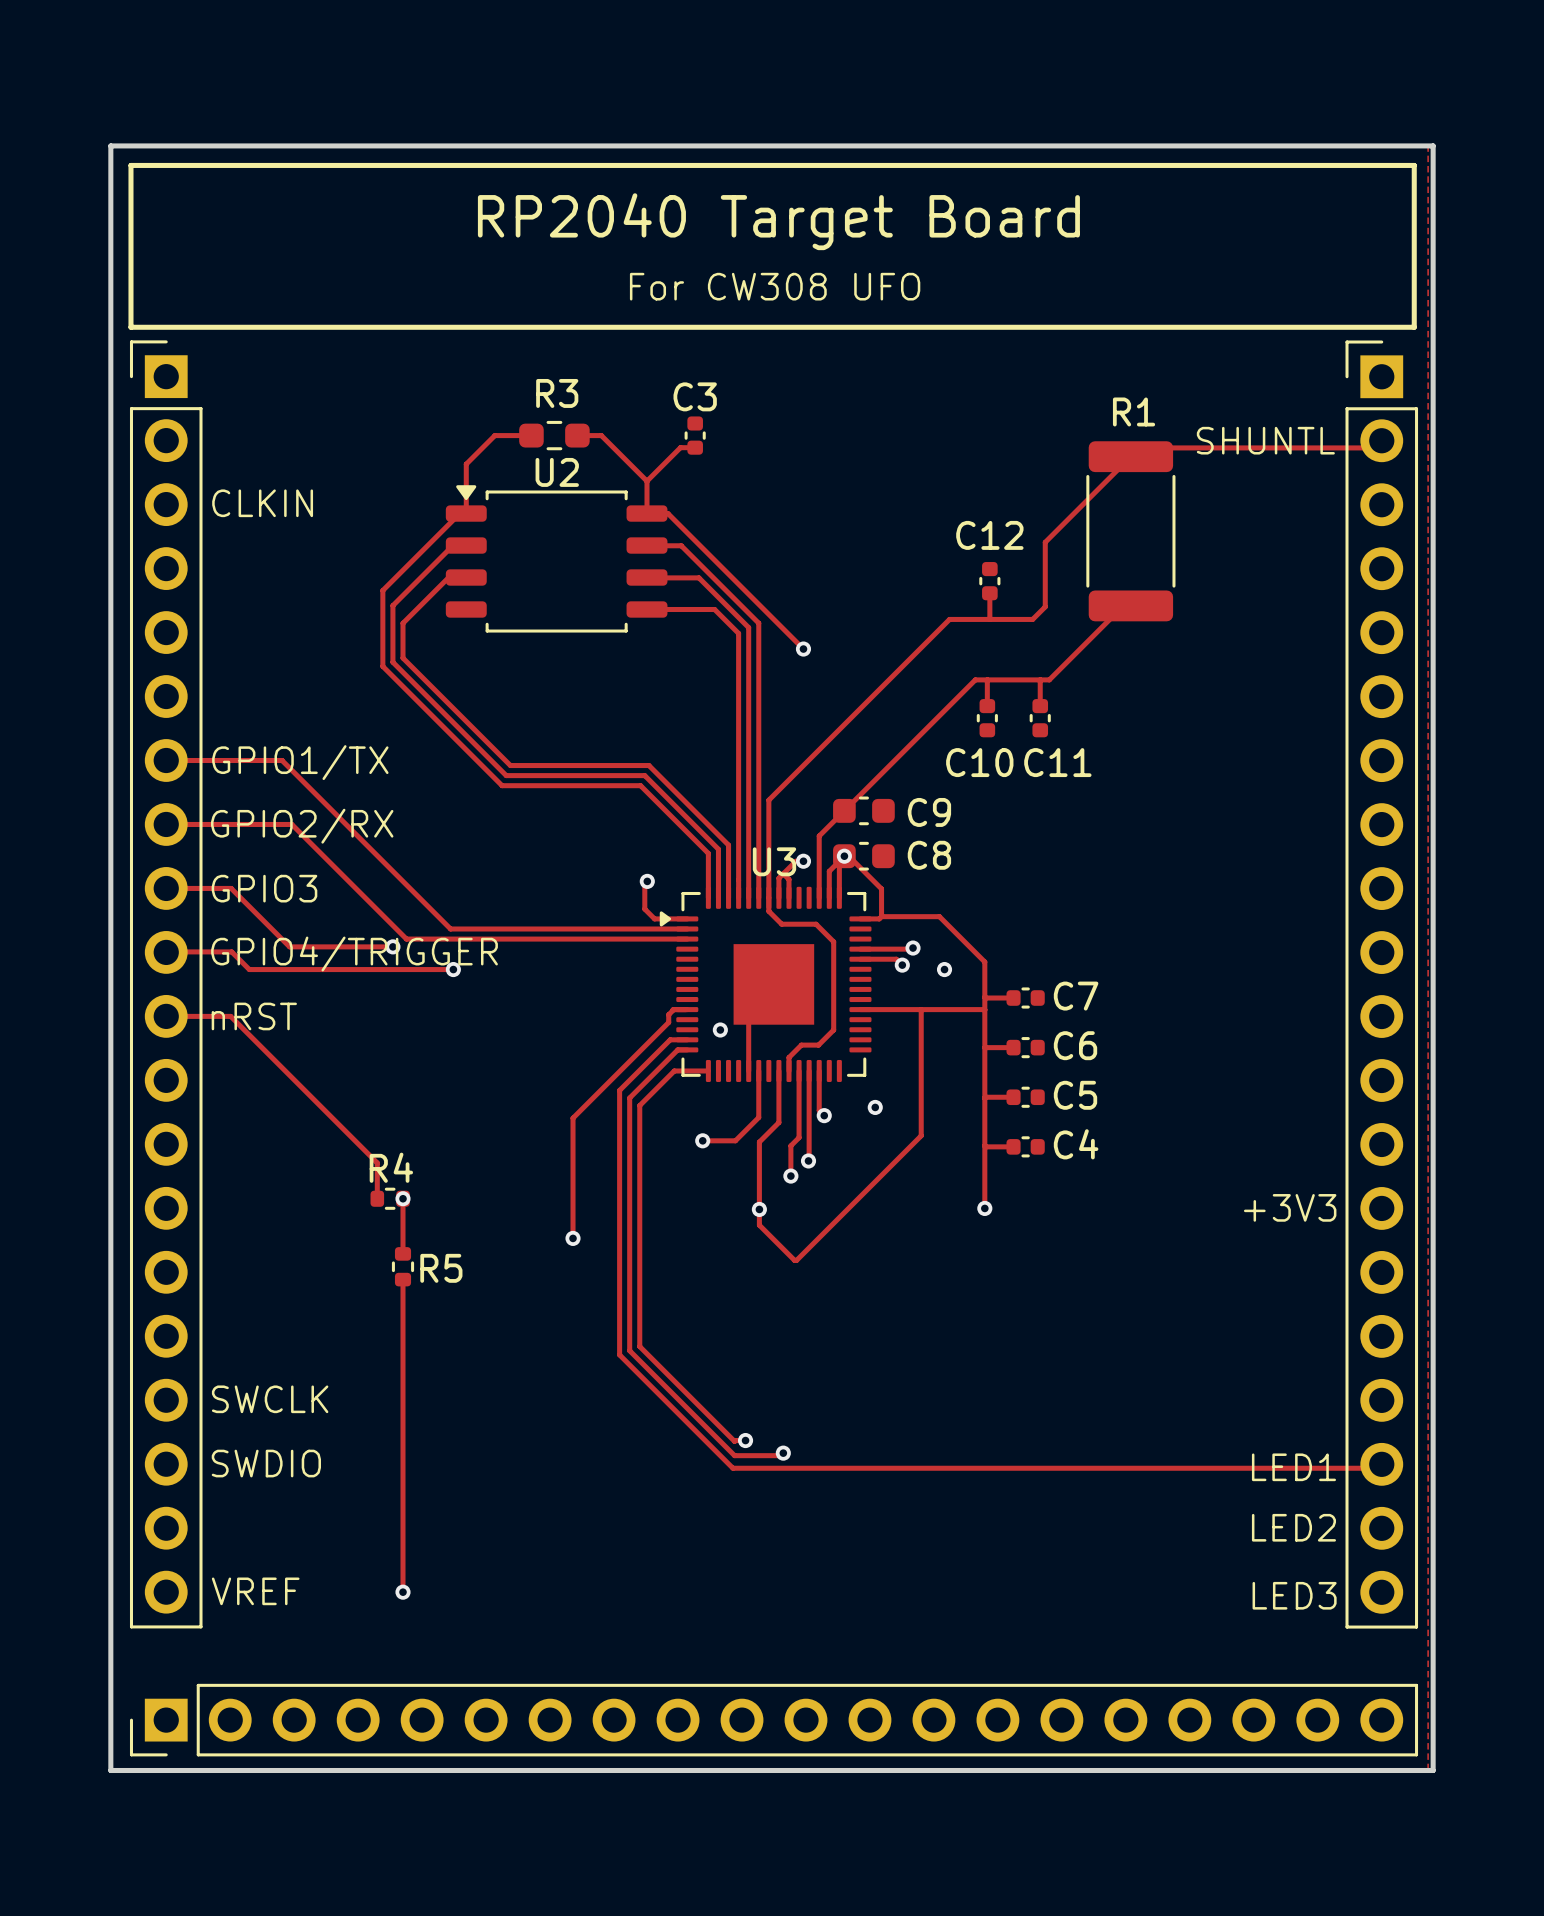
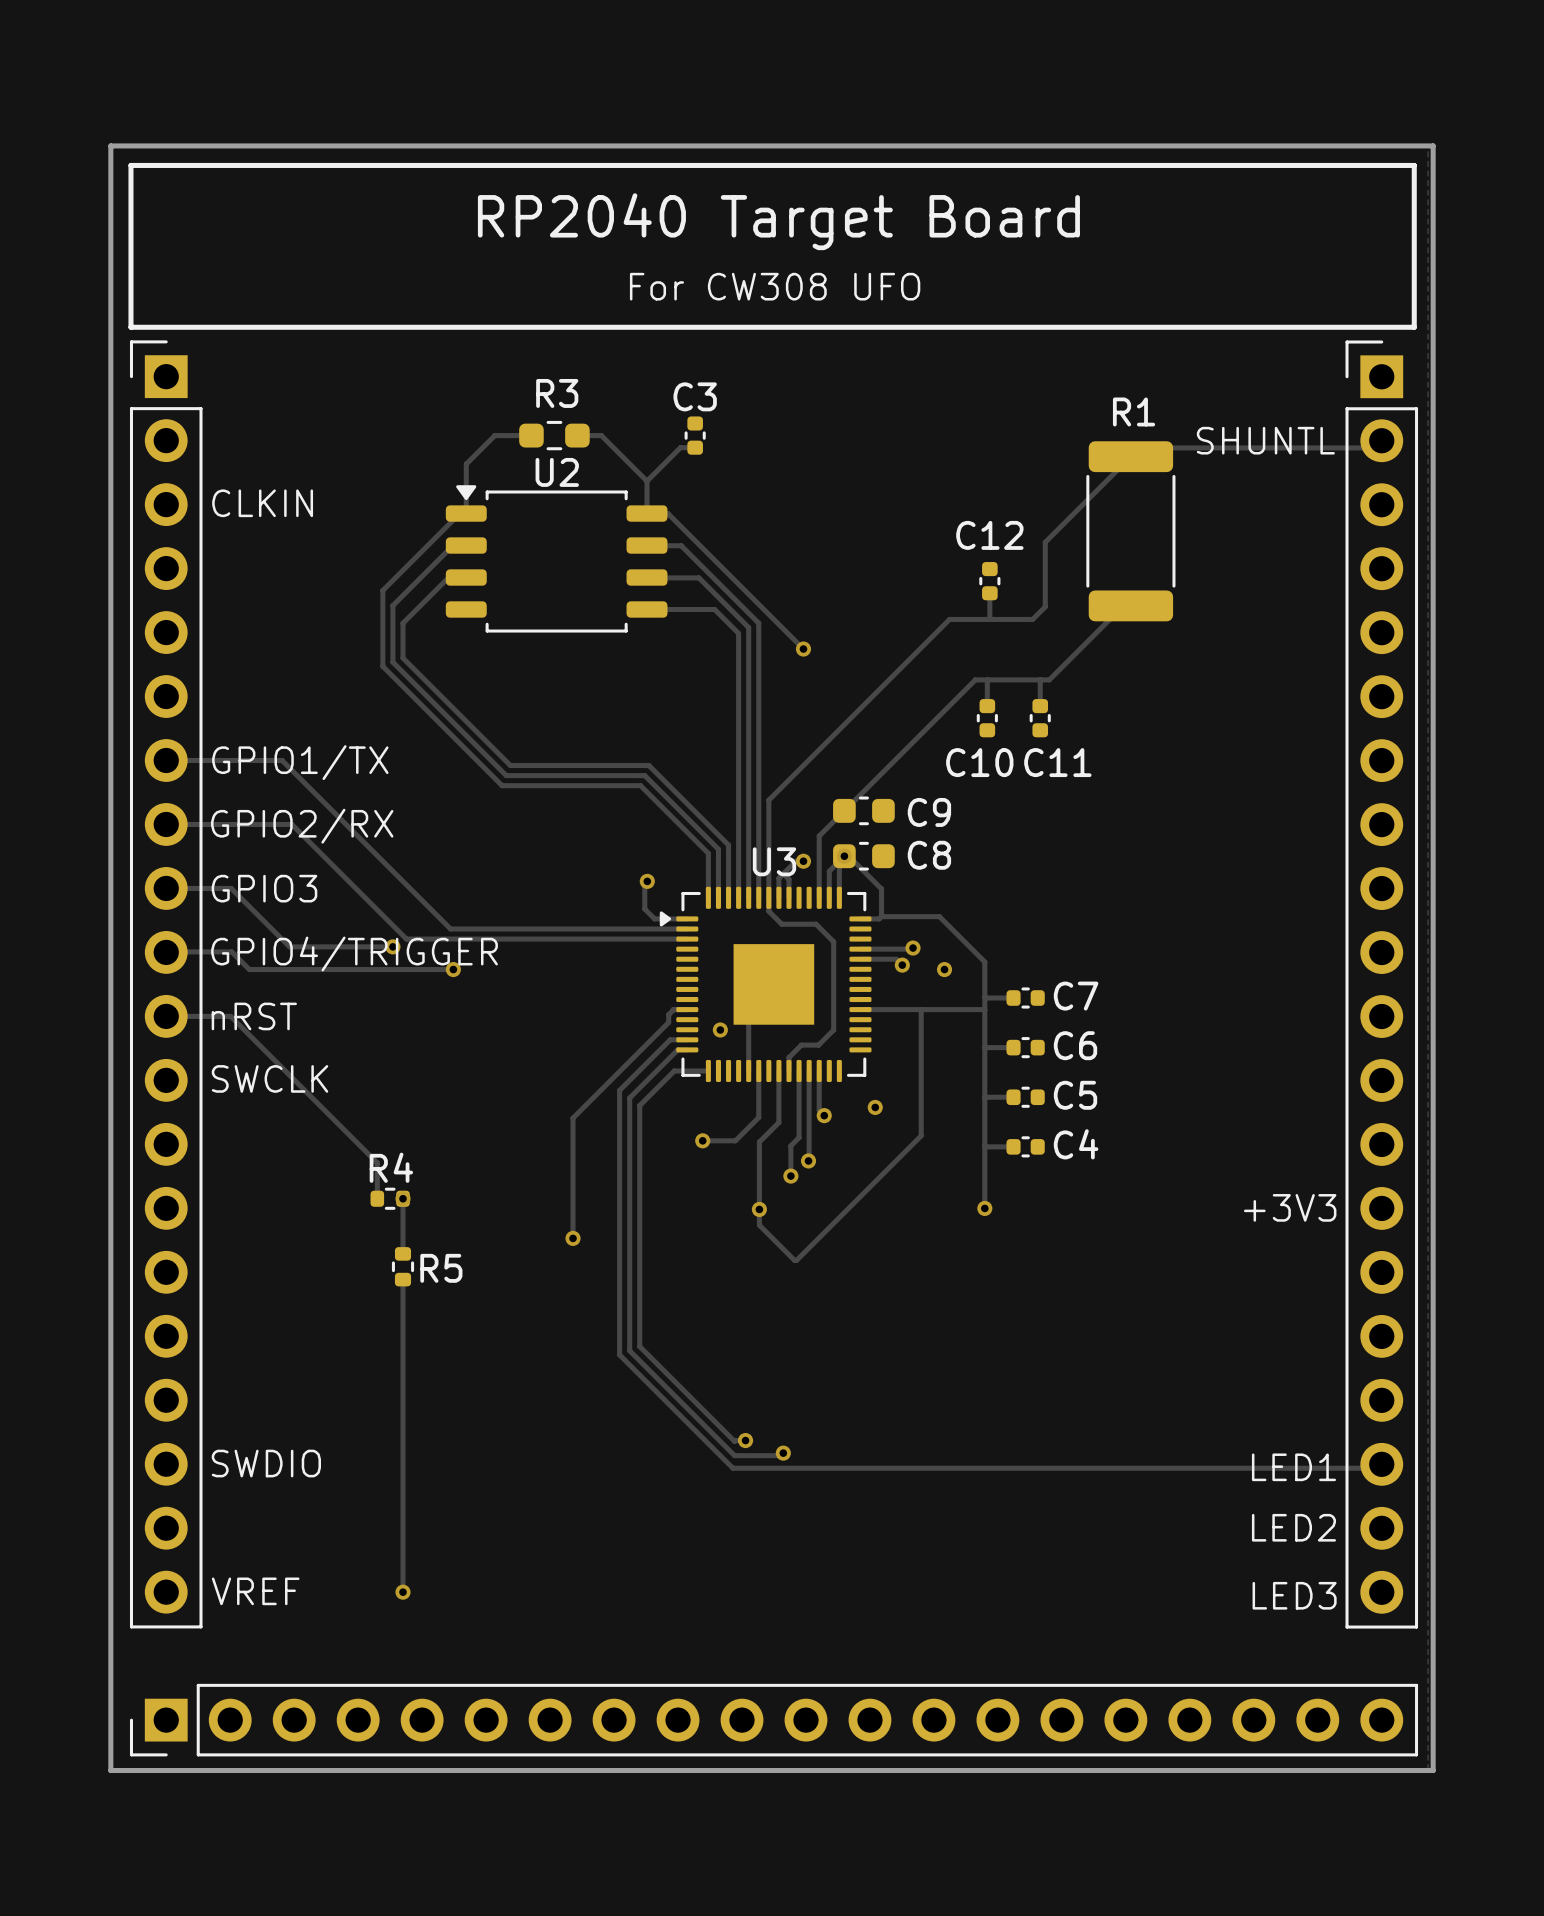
text position: SWCLK (270, 1399) -> SWCLK (270, 1078)

